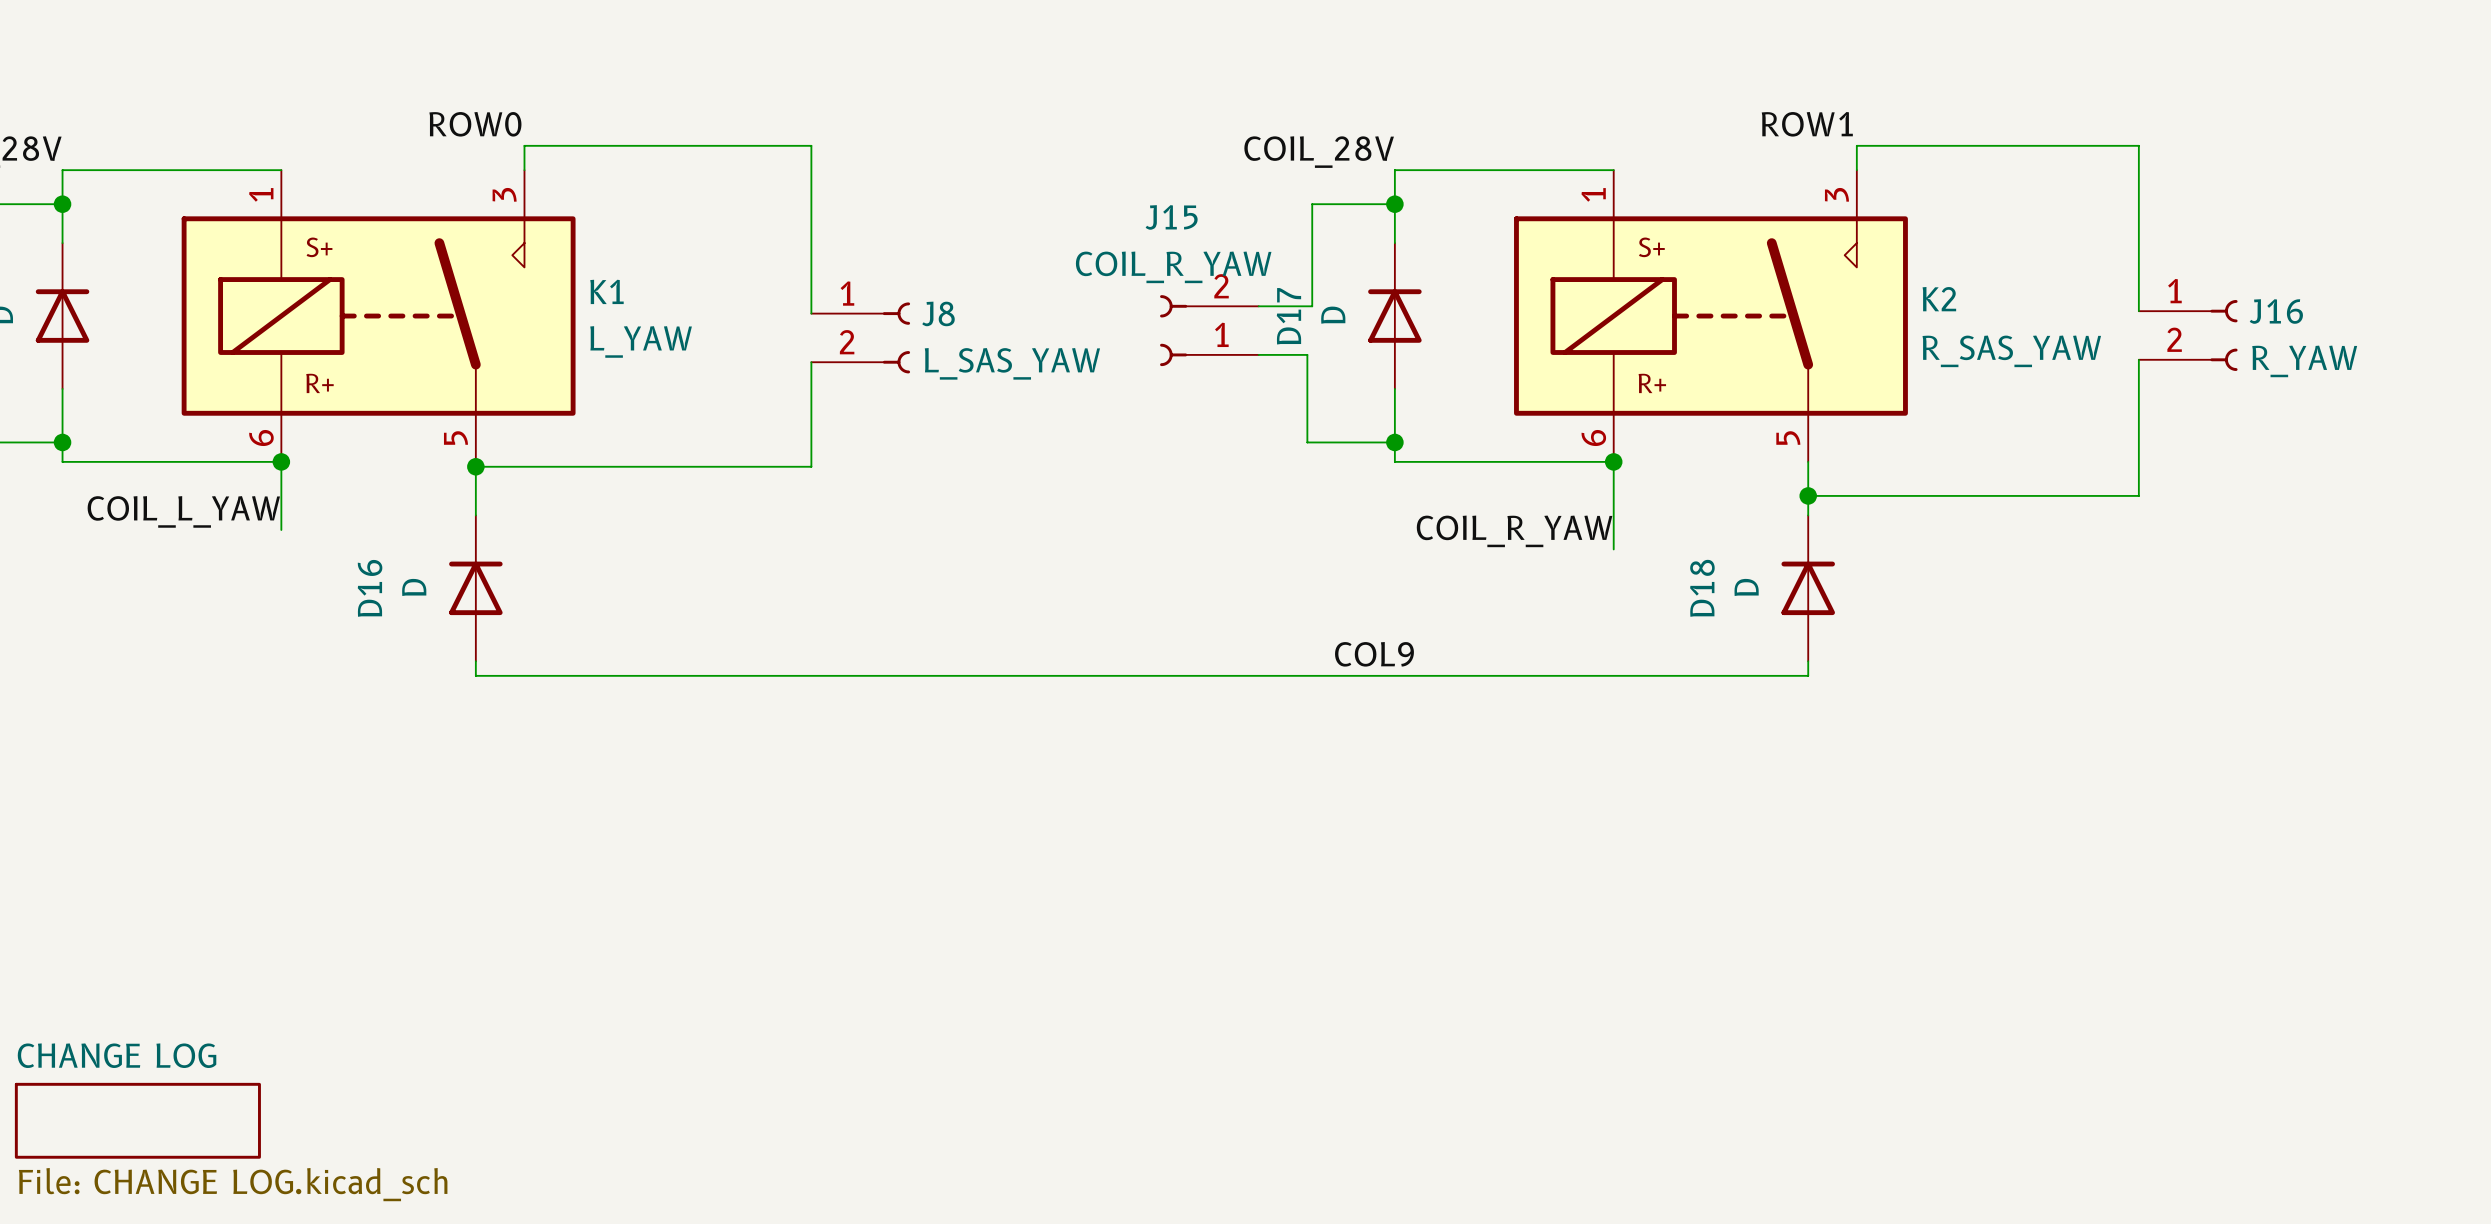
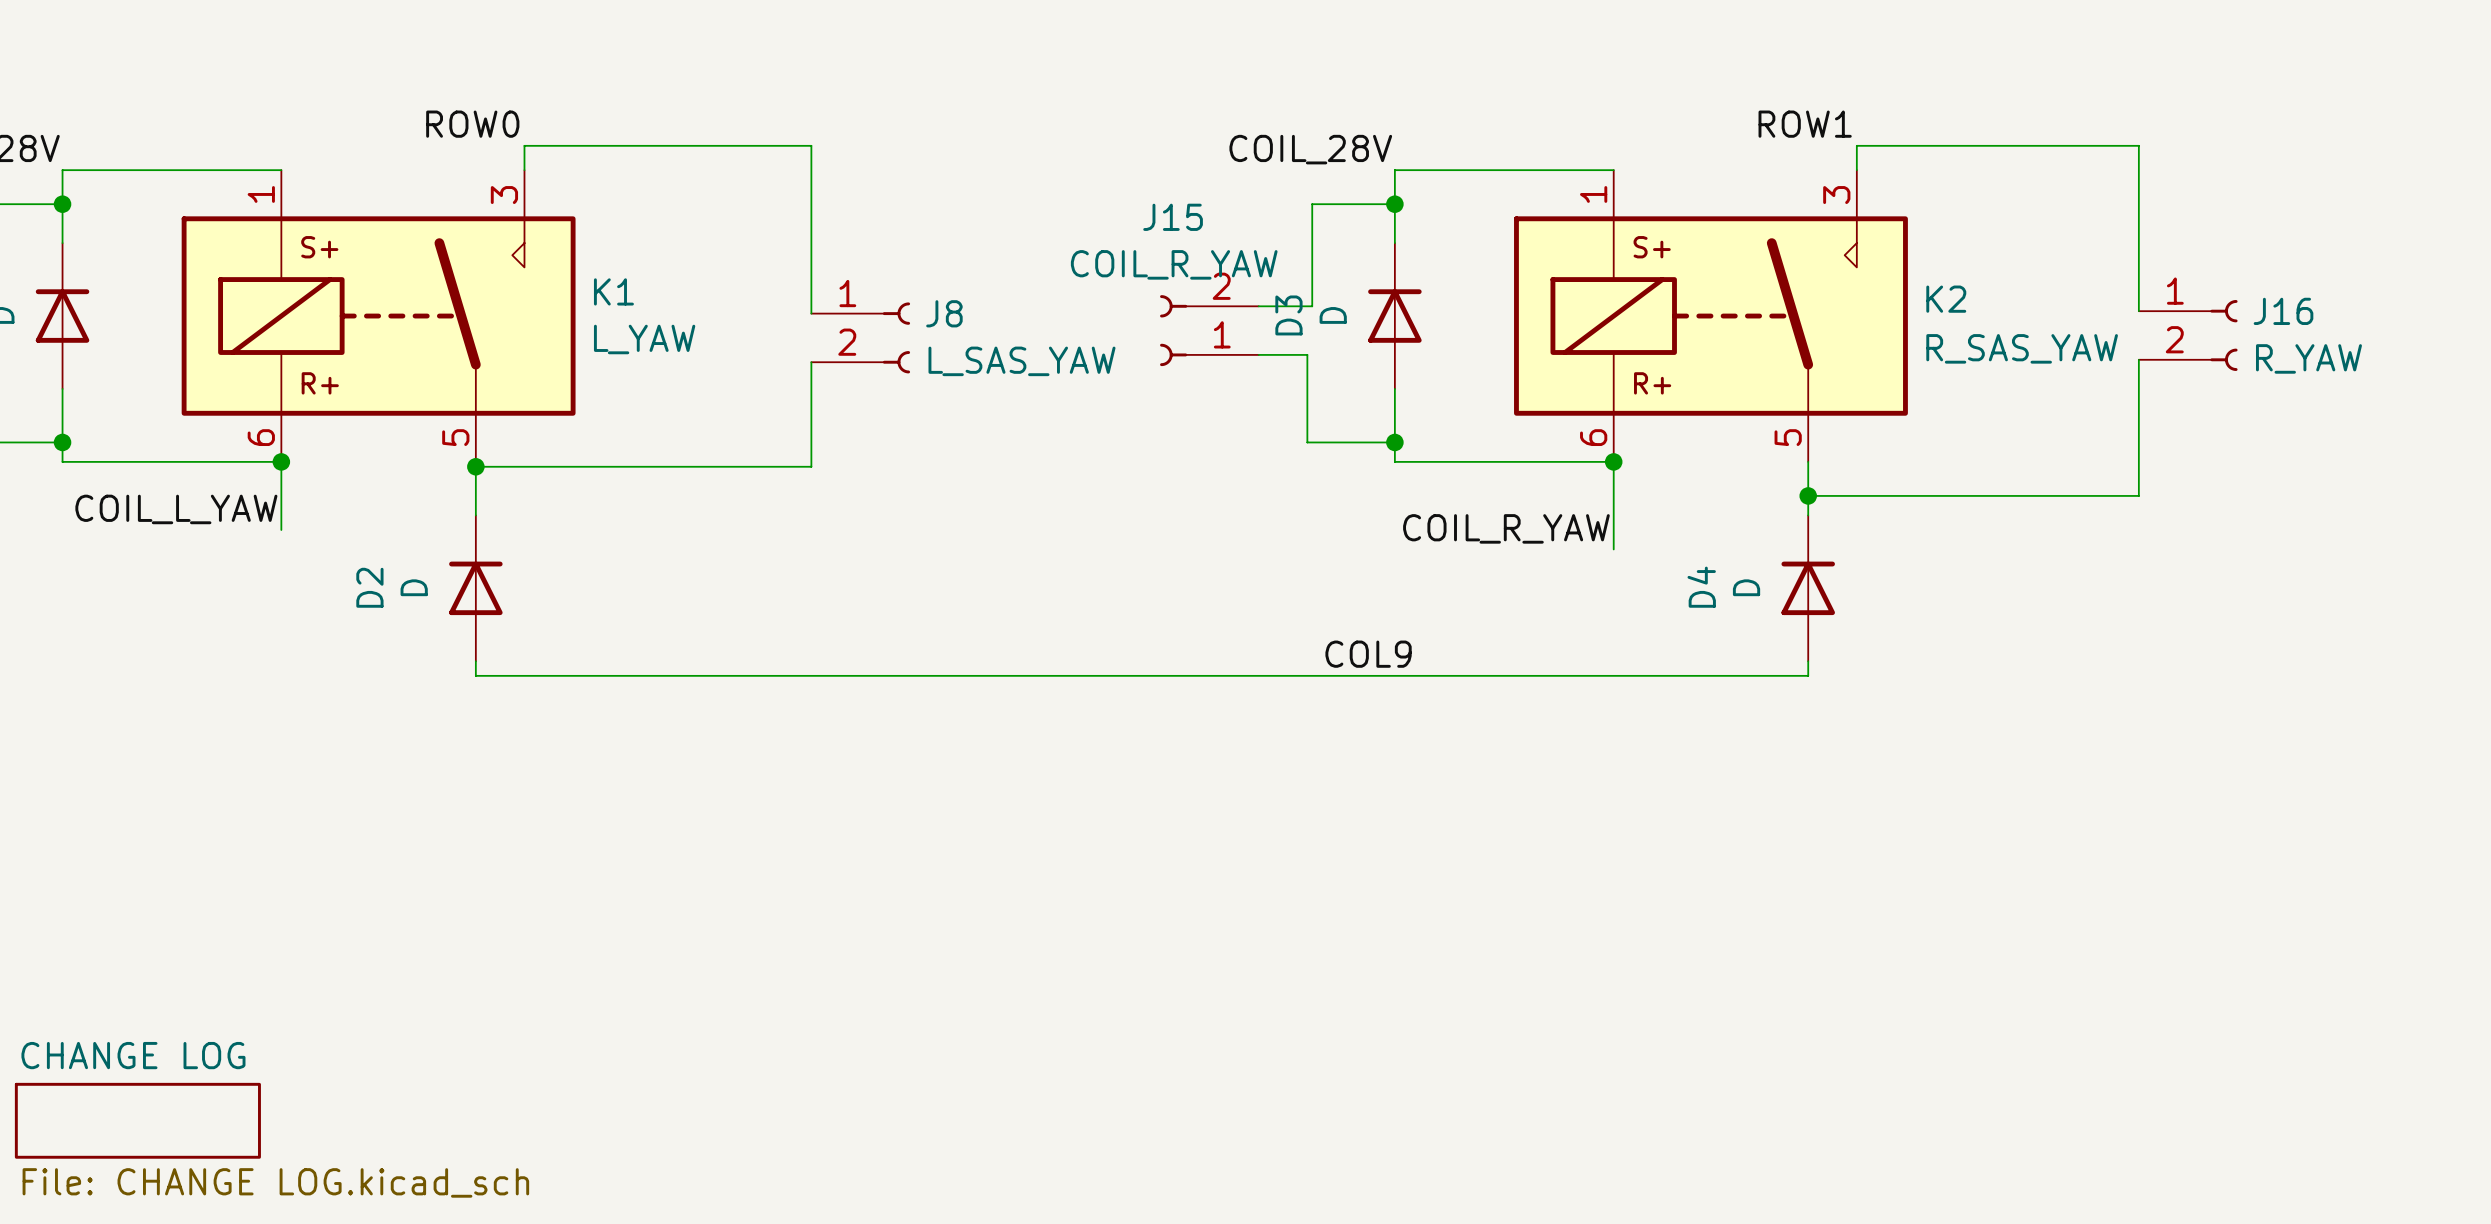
D17 name: D17 (1288, 316) -> D3 (1288, 315)
D16 name: D16 (370, 588) -> D2 (369, 587)
D18 name: D18 (1702, 588) -> D4 (1701, 587)

